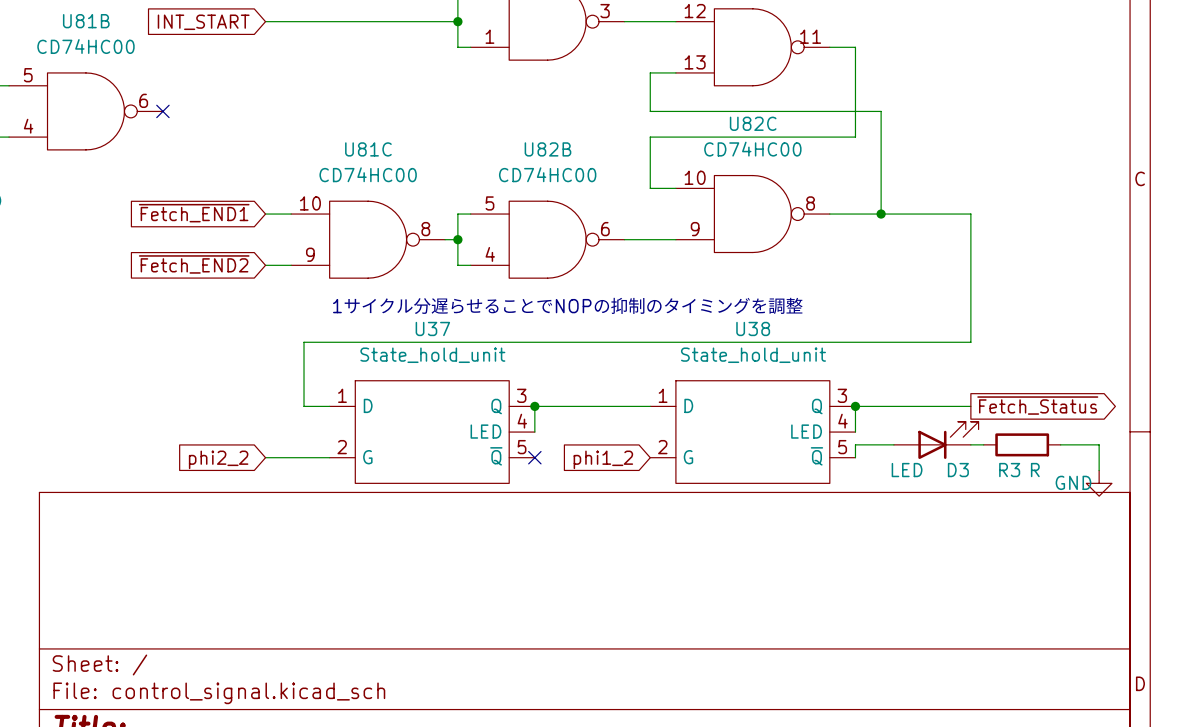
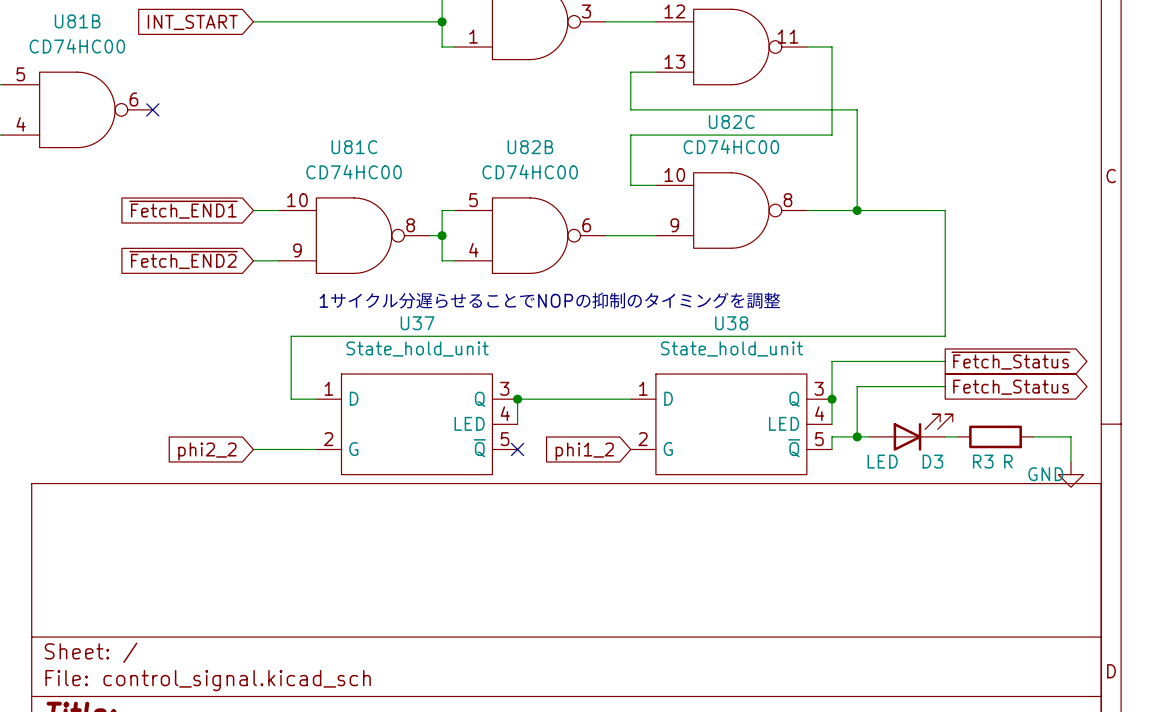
wire: none -> (945, 386) (857, 386) (857, 436)
global label: none -> Fetch_Status (1011, 387)
global label position: ~{Fetch_Status} (1037, 405) -> ~{Fetch_Status} (1010, 360)
wire: (855, 406) (970, 406) -> (832, 399) (832, 361) (945, 361)
junction: none -> (857, 436)

